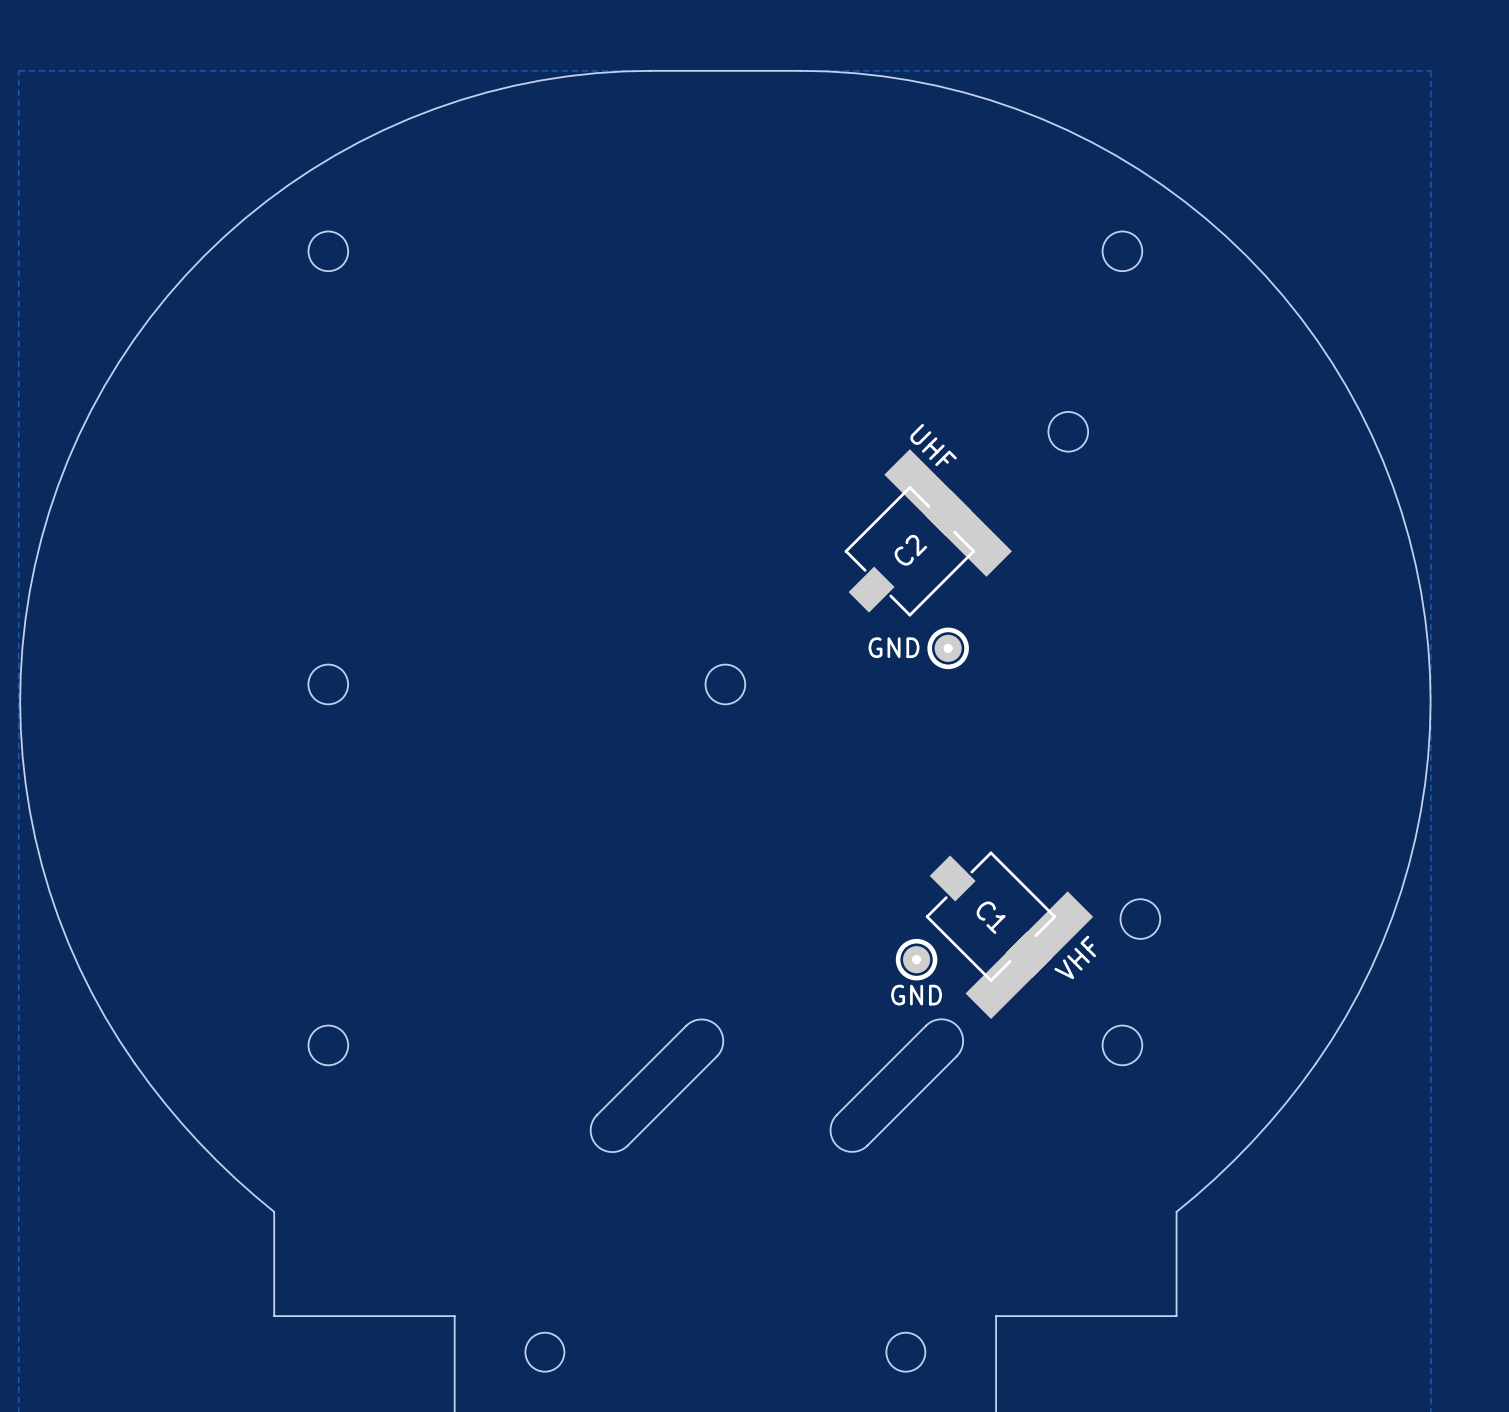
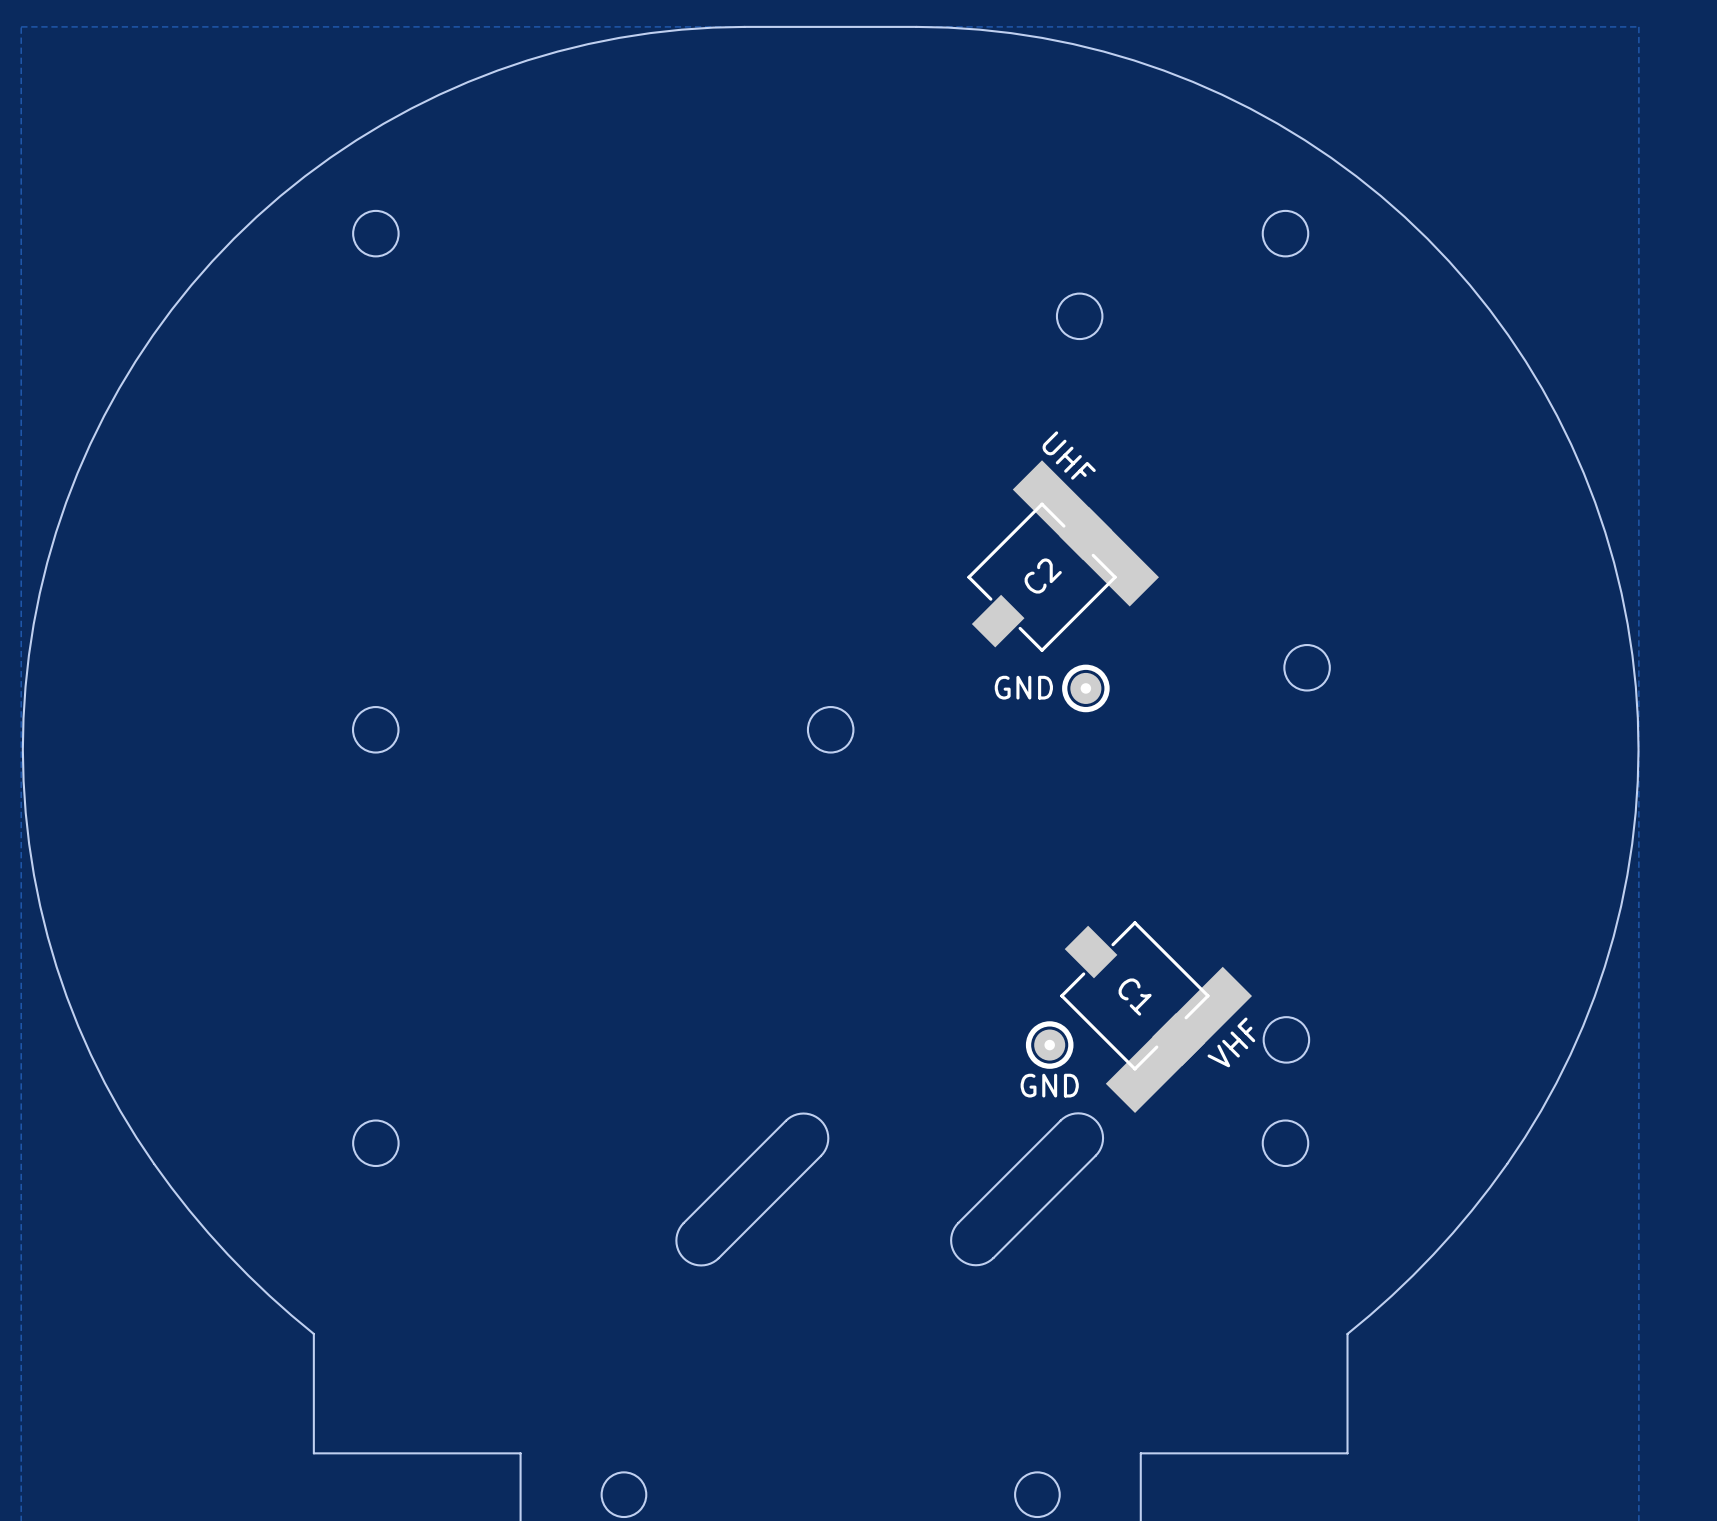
round board edge: none -> [1055, 292, 1104, 341]
round board edge: [1047, 411, 1090, 453] -> none
round board edge: none -> [1283, 643, 1331, 692]
round board edge position: (1140, 919) -> (1286, 1039)

